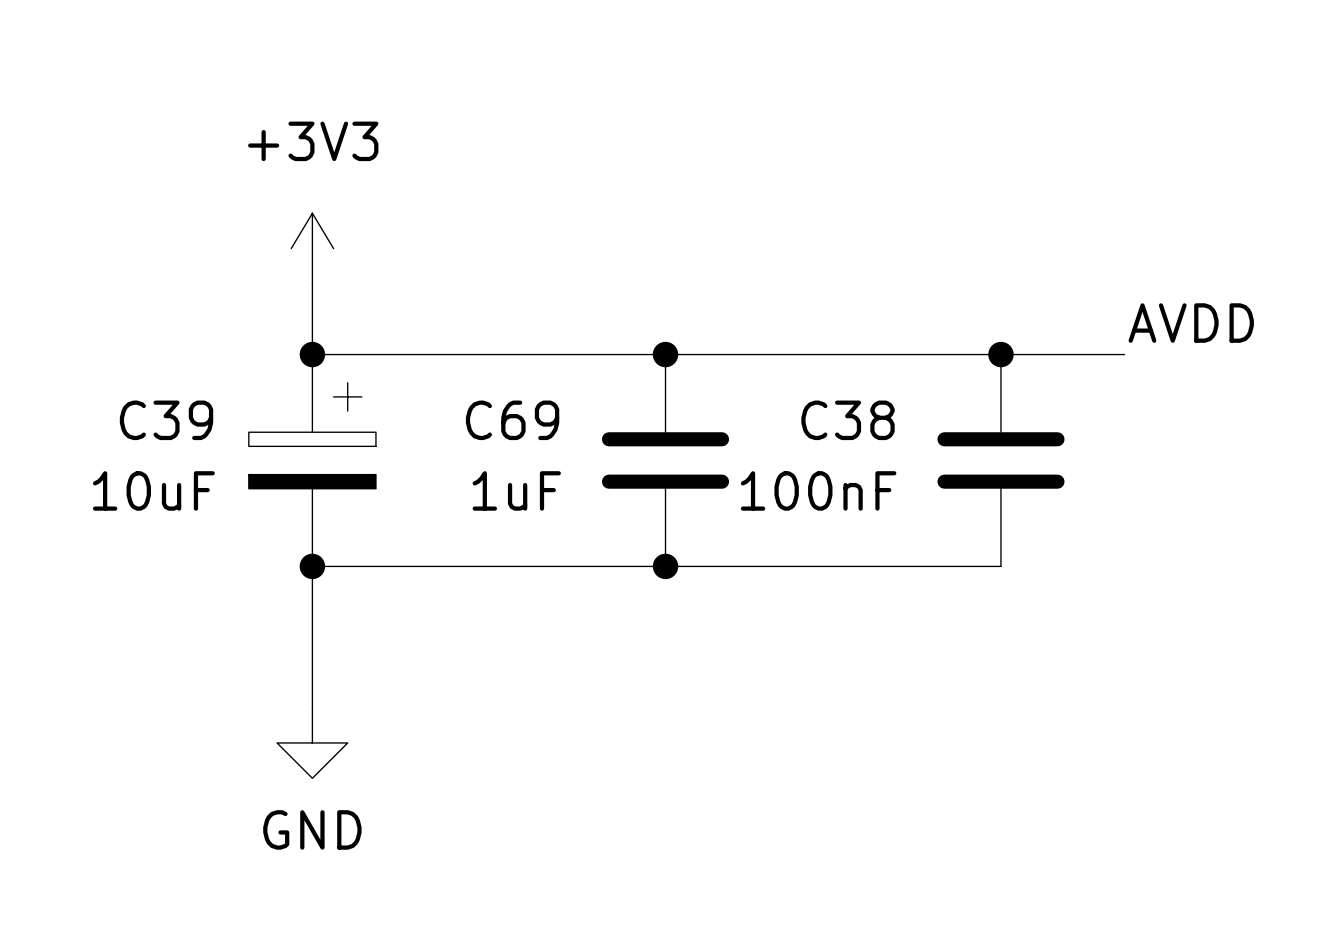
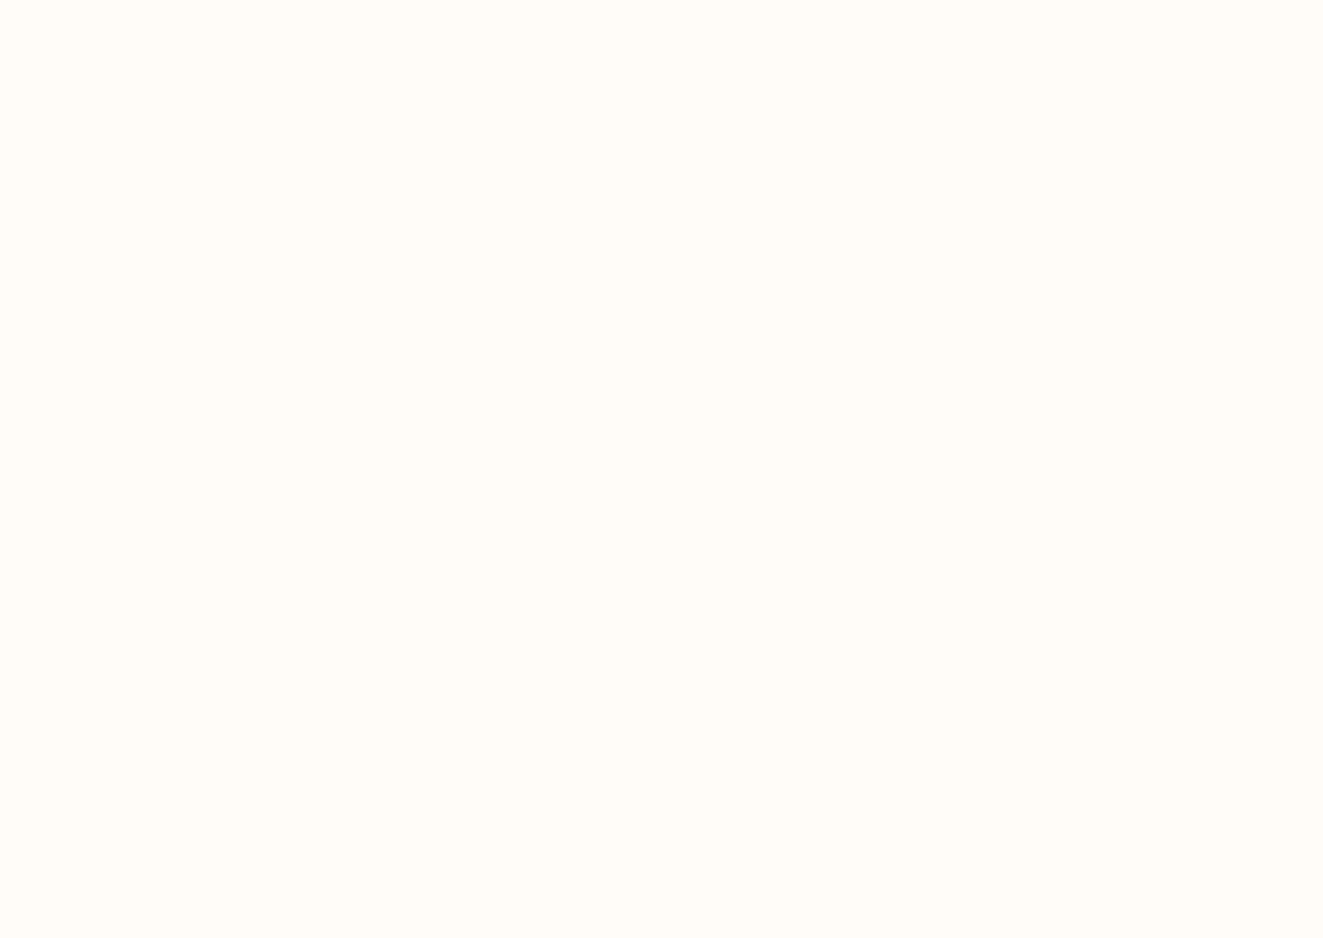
power symbol: +3V3 (312, 248) -> none
wire: (312, 283) (312, 354) (1124, 354) -> none
label: AVDD (1191, 323) -> none
junction: (312, 354) -> none
junction: (665, 354) -> none
junction: (1000, 354) -> none
C39: 10uF (312, 460) -> none
C69: 1uF (665, 460) -> none
C38: 100nF (1000, 460) -> none
junction: (312, 566) -> none
junction: (665, 566) -> none
wire: (1000, 566) (312, 566) (312, 707) -> none
power symbol: GND (312, 742) -> none

